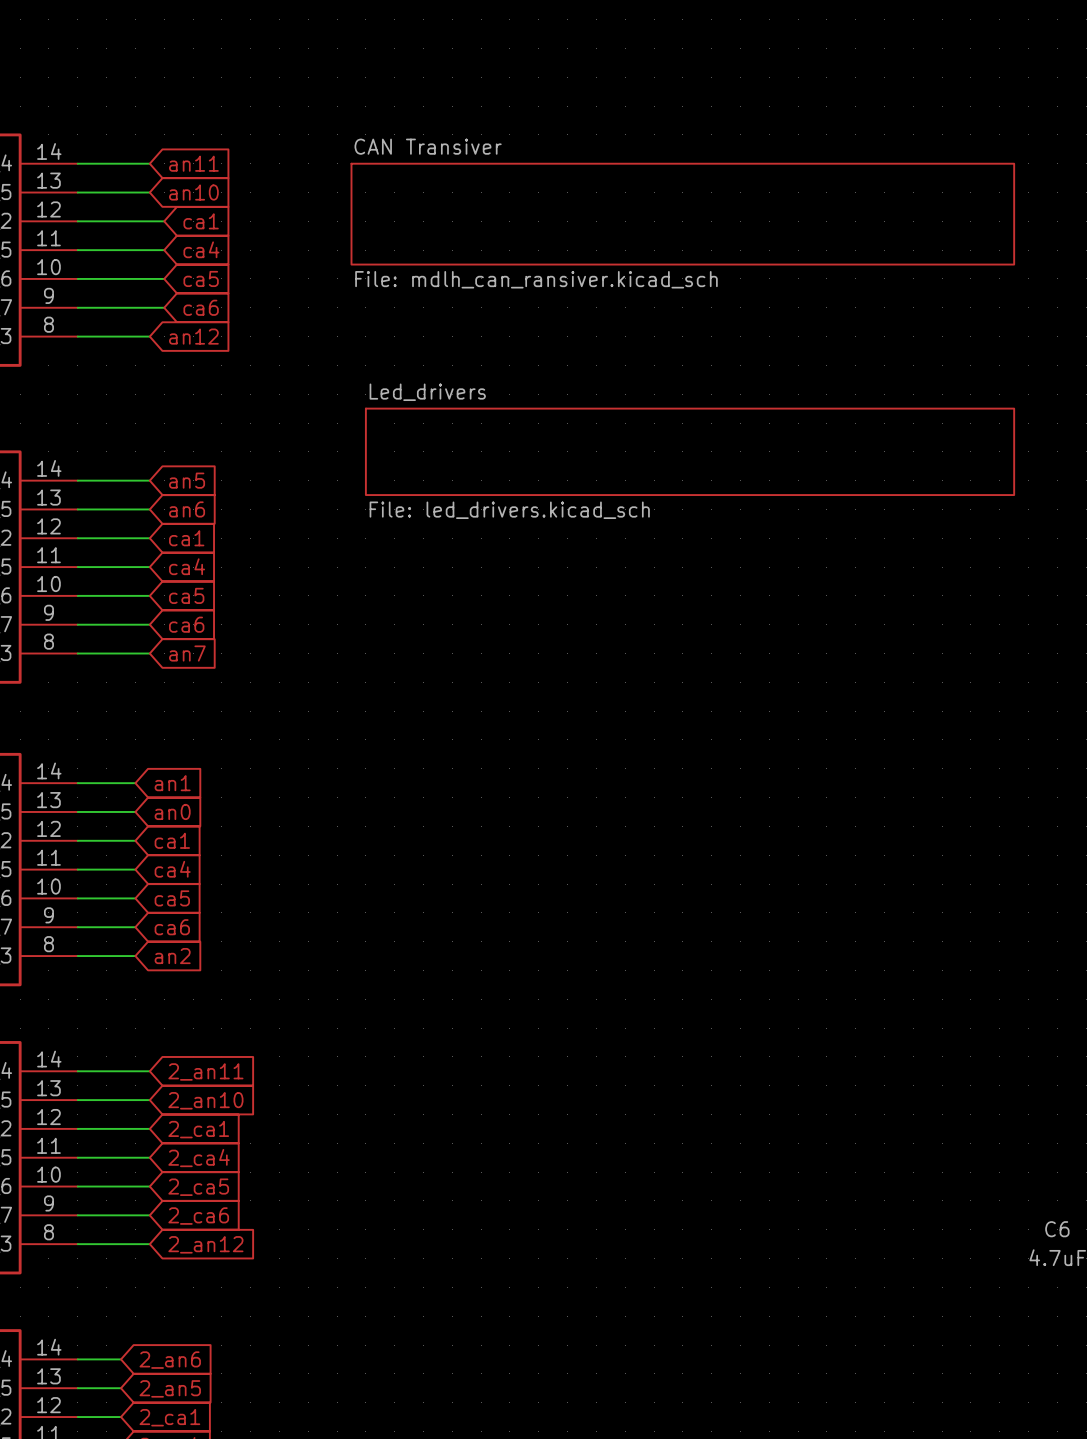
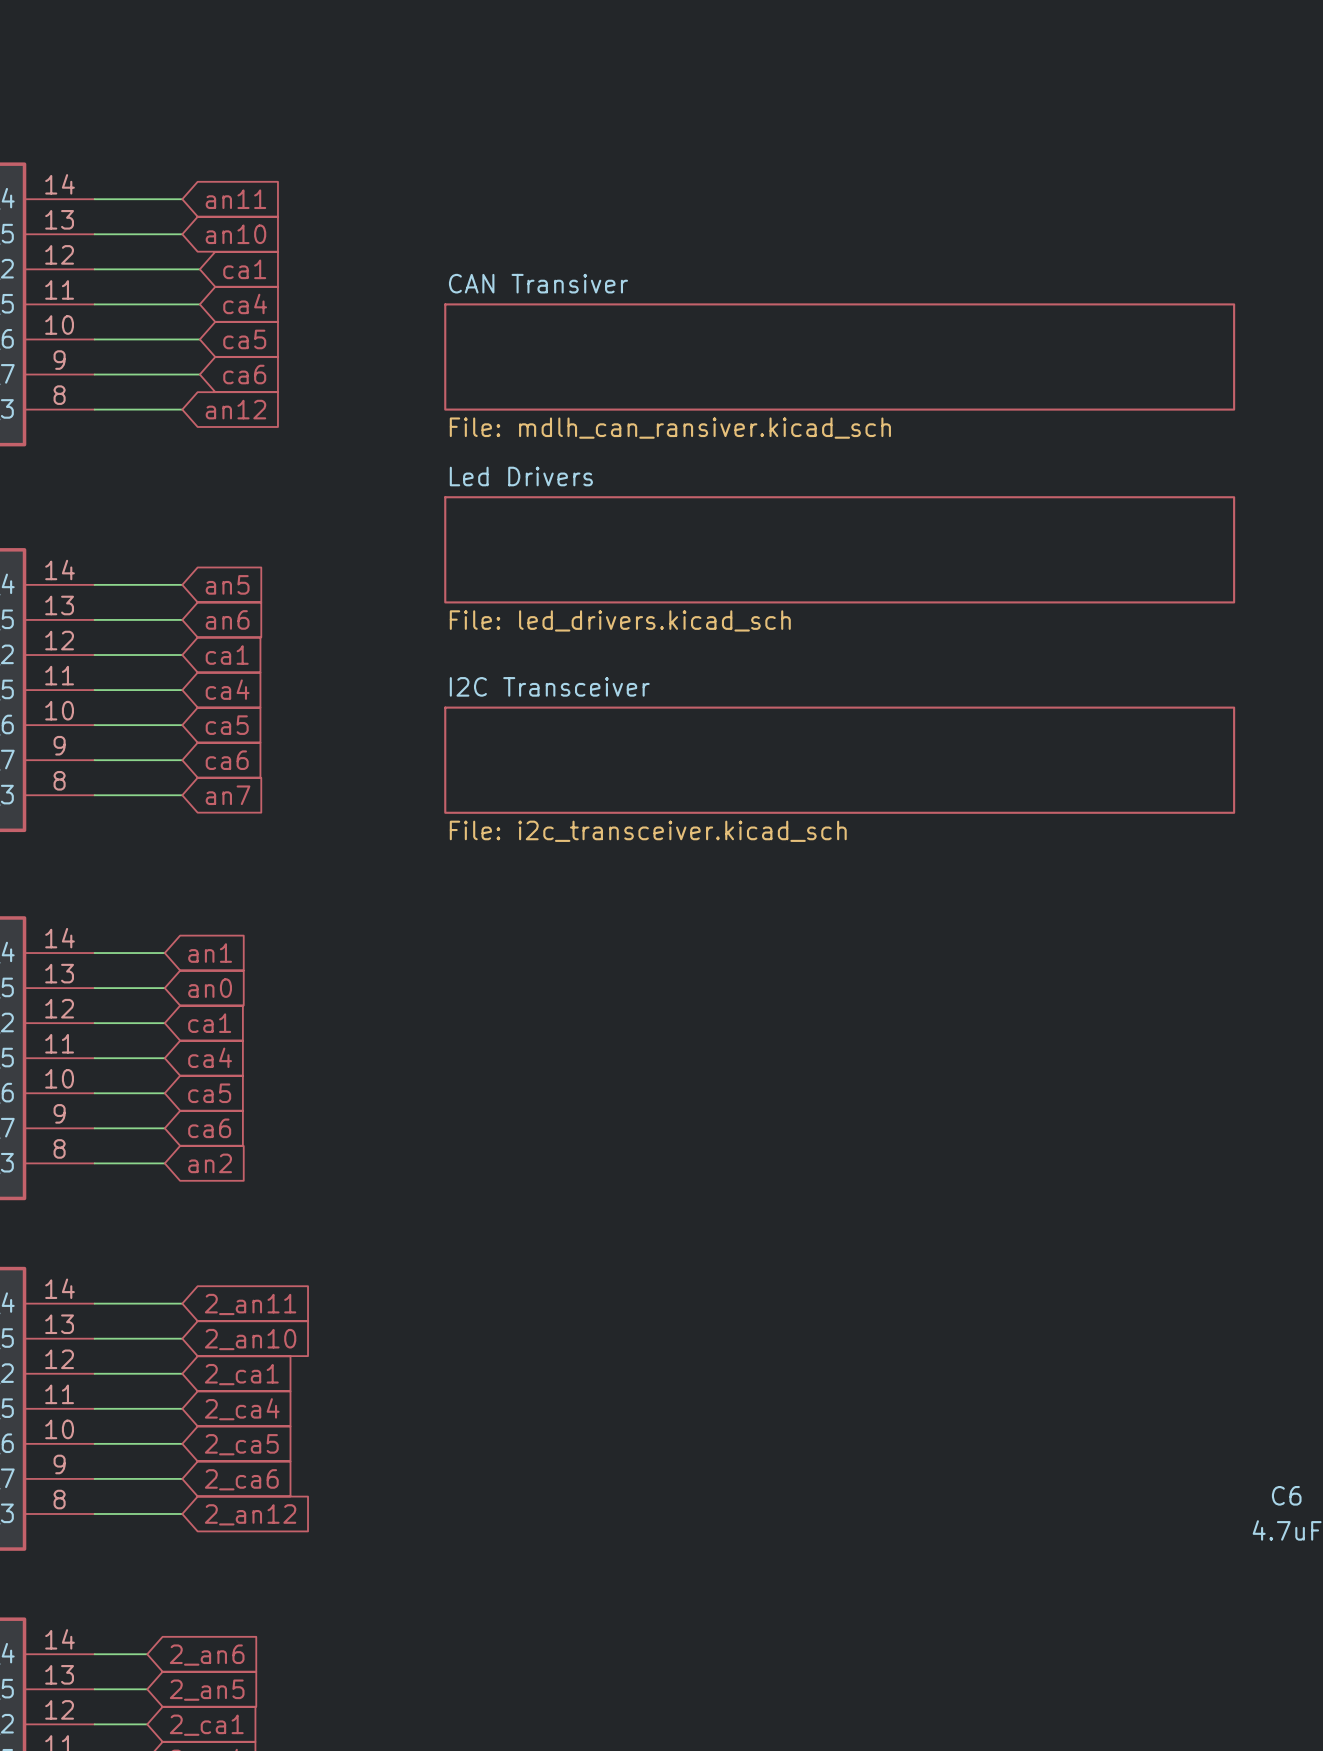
sheet CAN Transiver: File: mdlh_can_ransiver.kicad_sch (682, 214) -> none
sheet CAN Transiver: none -> File: mdlh_can_ransiver.kicad_sch (839, 356)
sheet Led_drivers name: Led_drivers (427, 392) -> Led Drivers (521, 476)
sheet I2C Transceiver: none -> File: i2c_transceiver.kicad_sch (839, 760)

